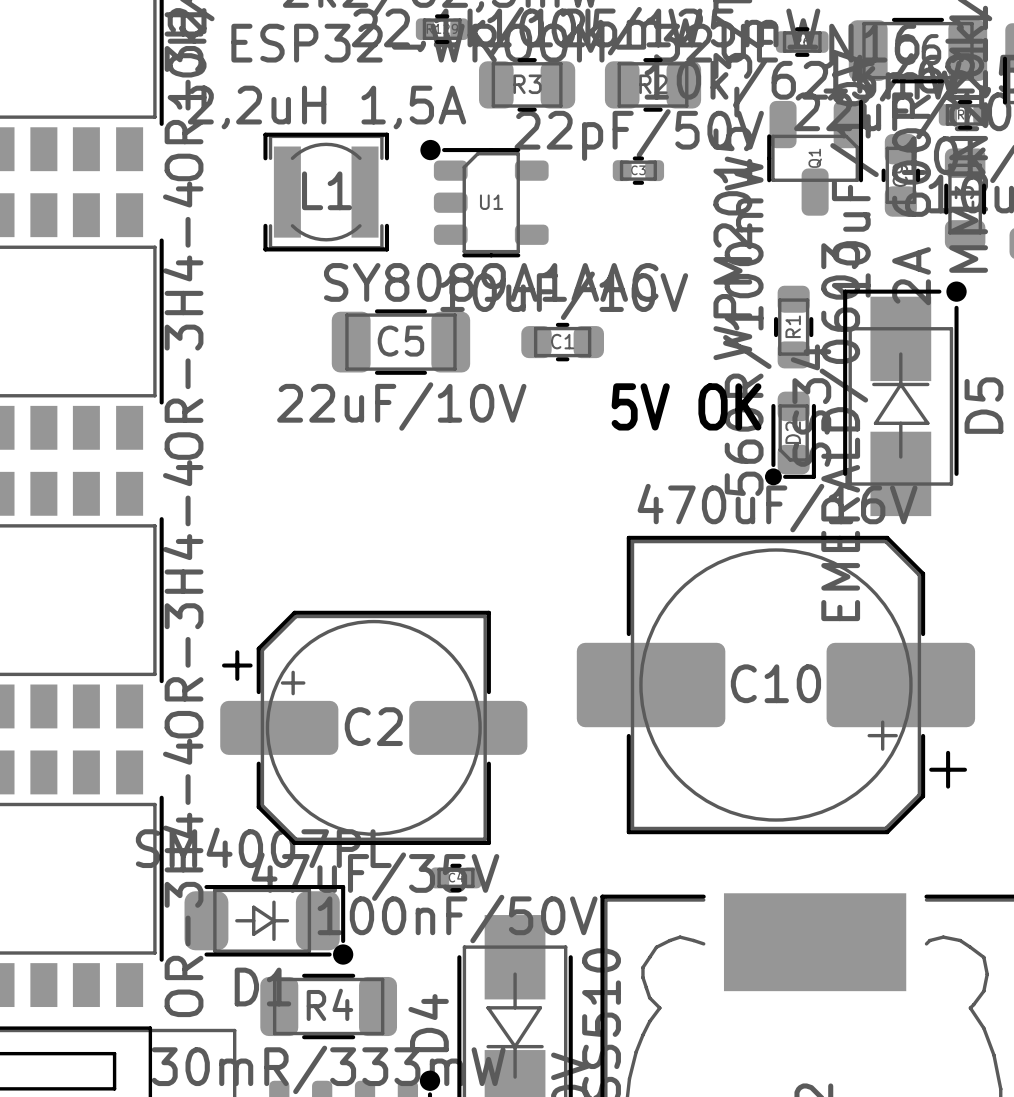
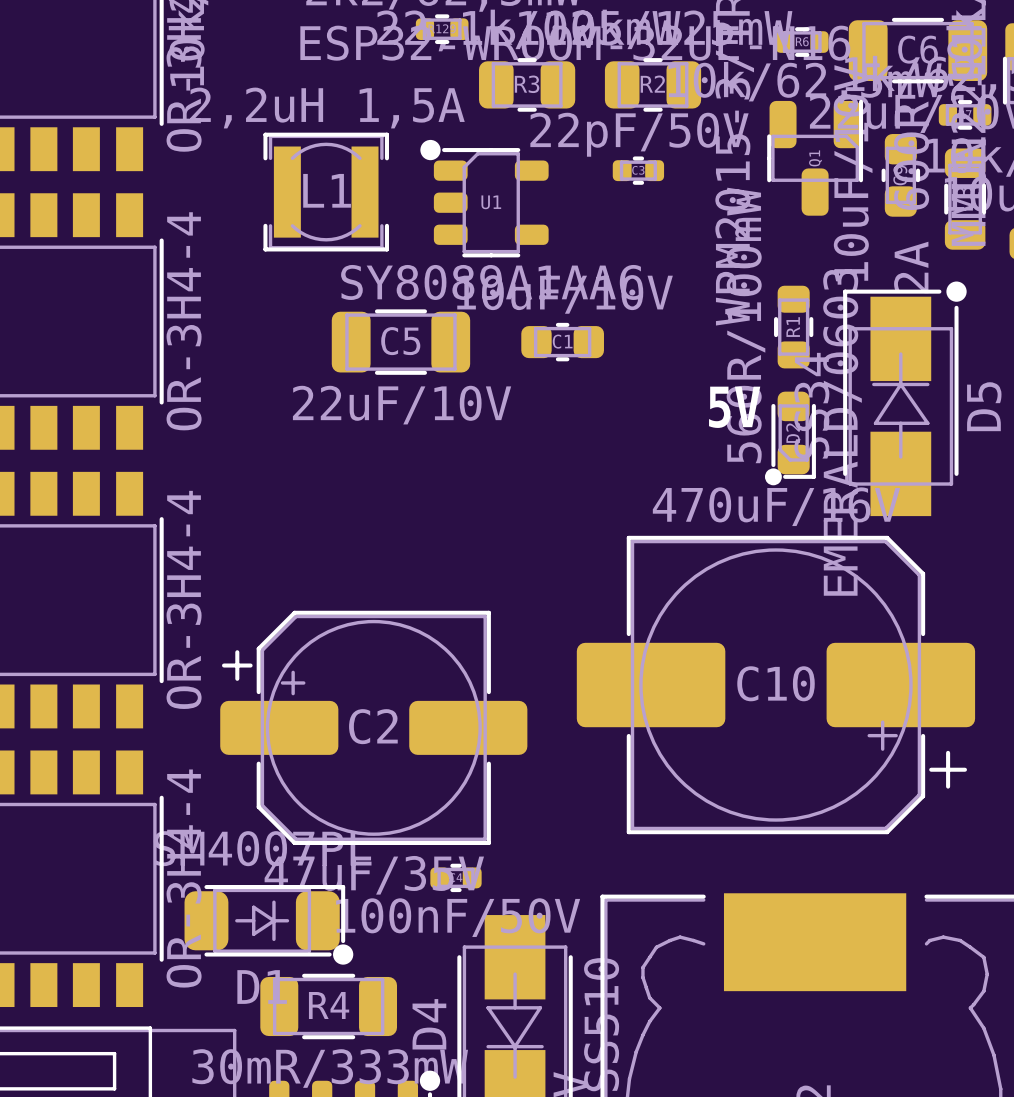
text: 5V OK (686, 406) -> none
text: none -> 5V (734, 407)

